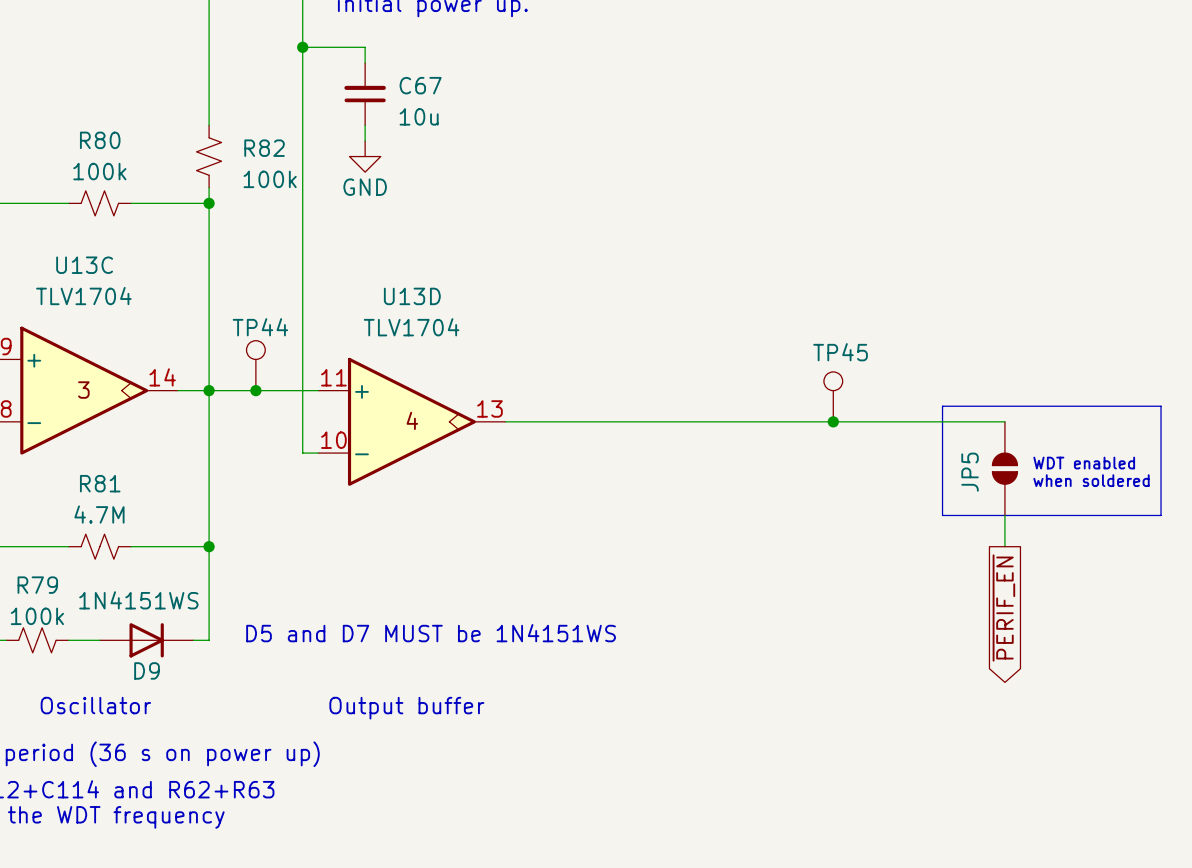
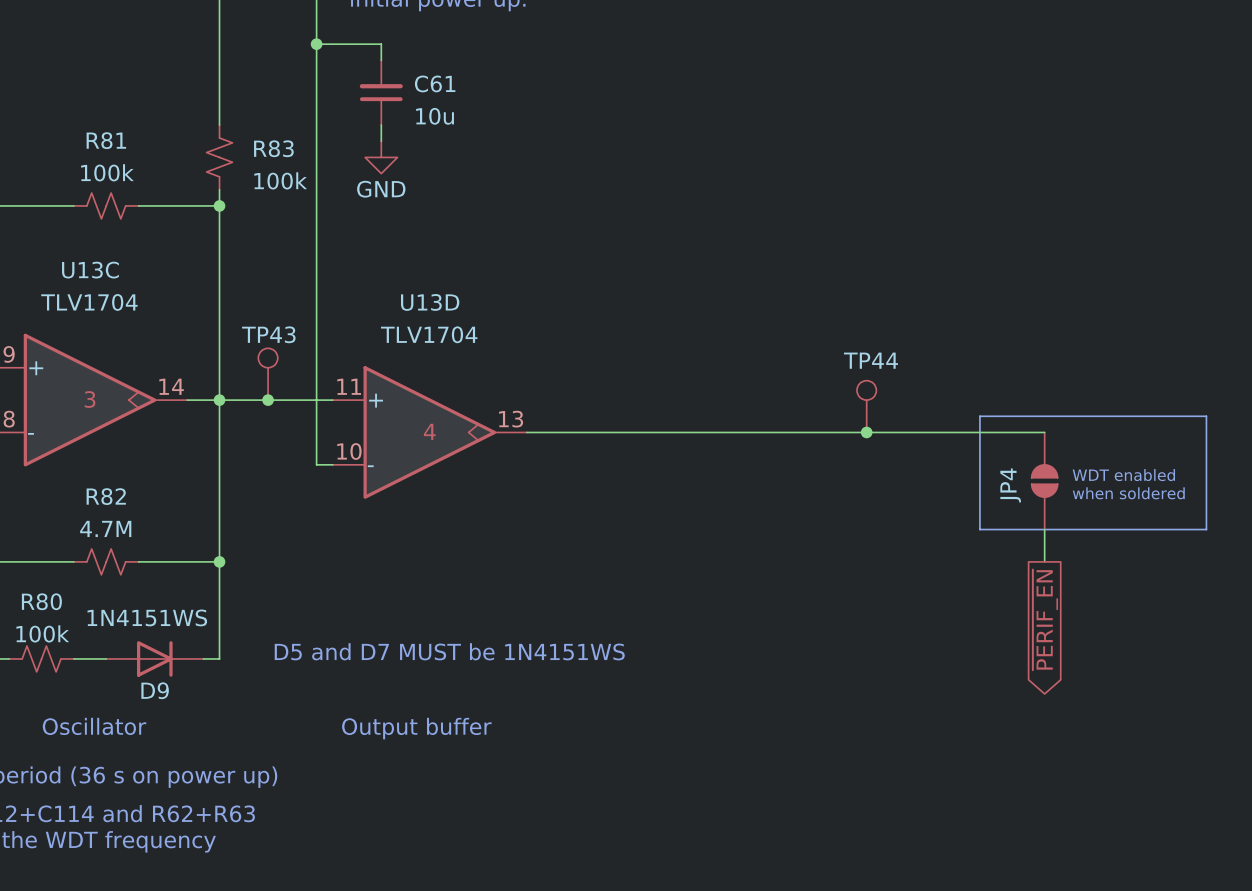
C67 name: C67 (420, 85) -> C61 (435, 83)
R80 name: R80 (100, 140) -> R81 (106, 140)
R82 name: R82 (264, 148) -> R83 (273, 148)
TP44 name: TP44 (260, 327) -> TP43 (268, 334)
TP45 name: TP45 (840, 352) -> TP44 (870, 360)
JP5 name: JP5 (970, 472) -> JP4 (1010, 485)
R81 name: R81 (100, 483) -> R82 (106, 496)
R79 name: R79 (37, 585) -> R80 (41, 601)

